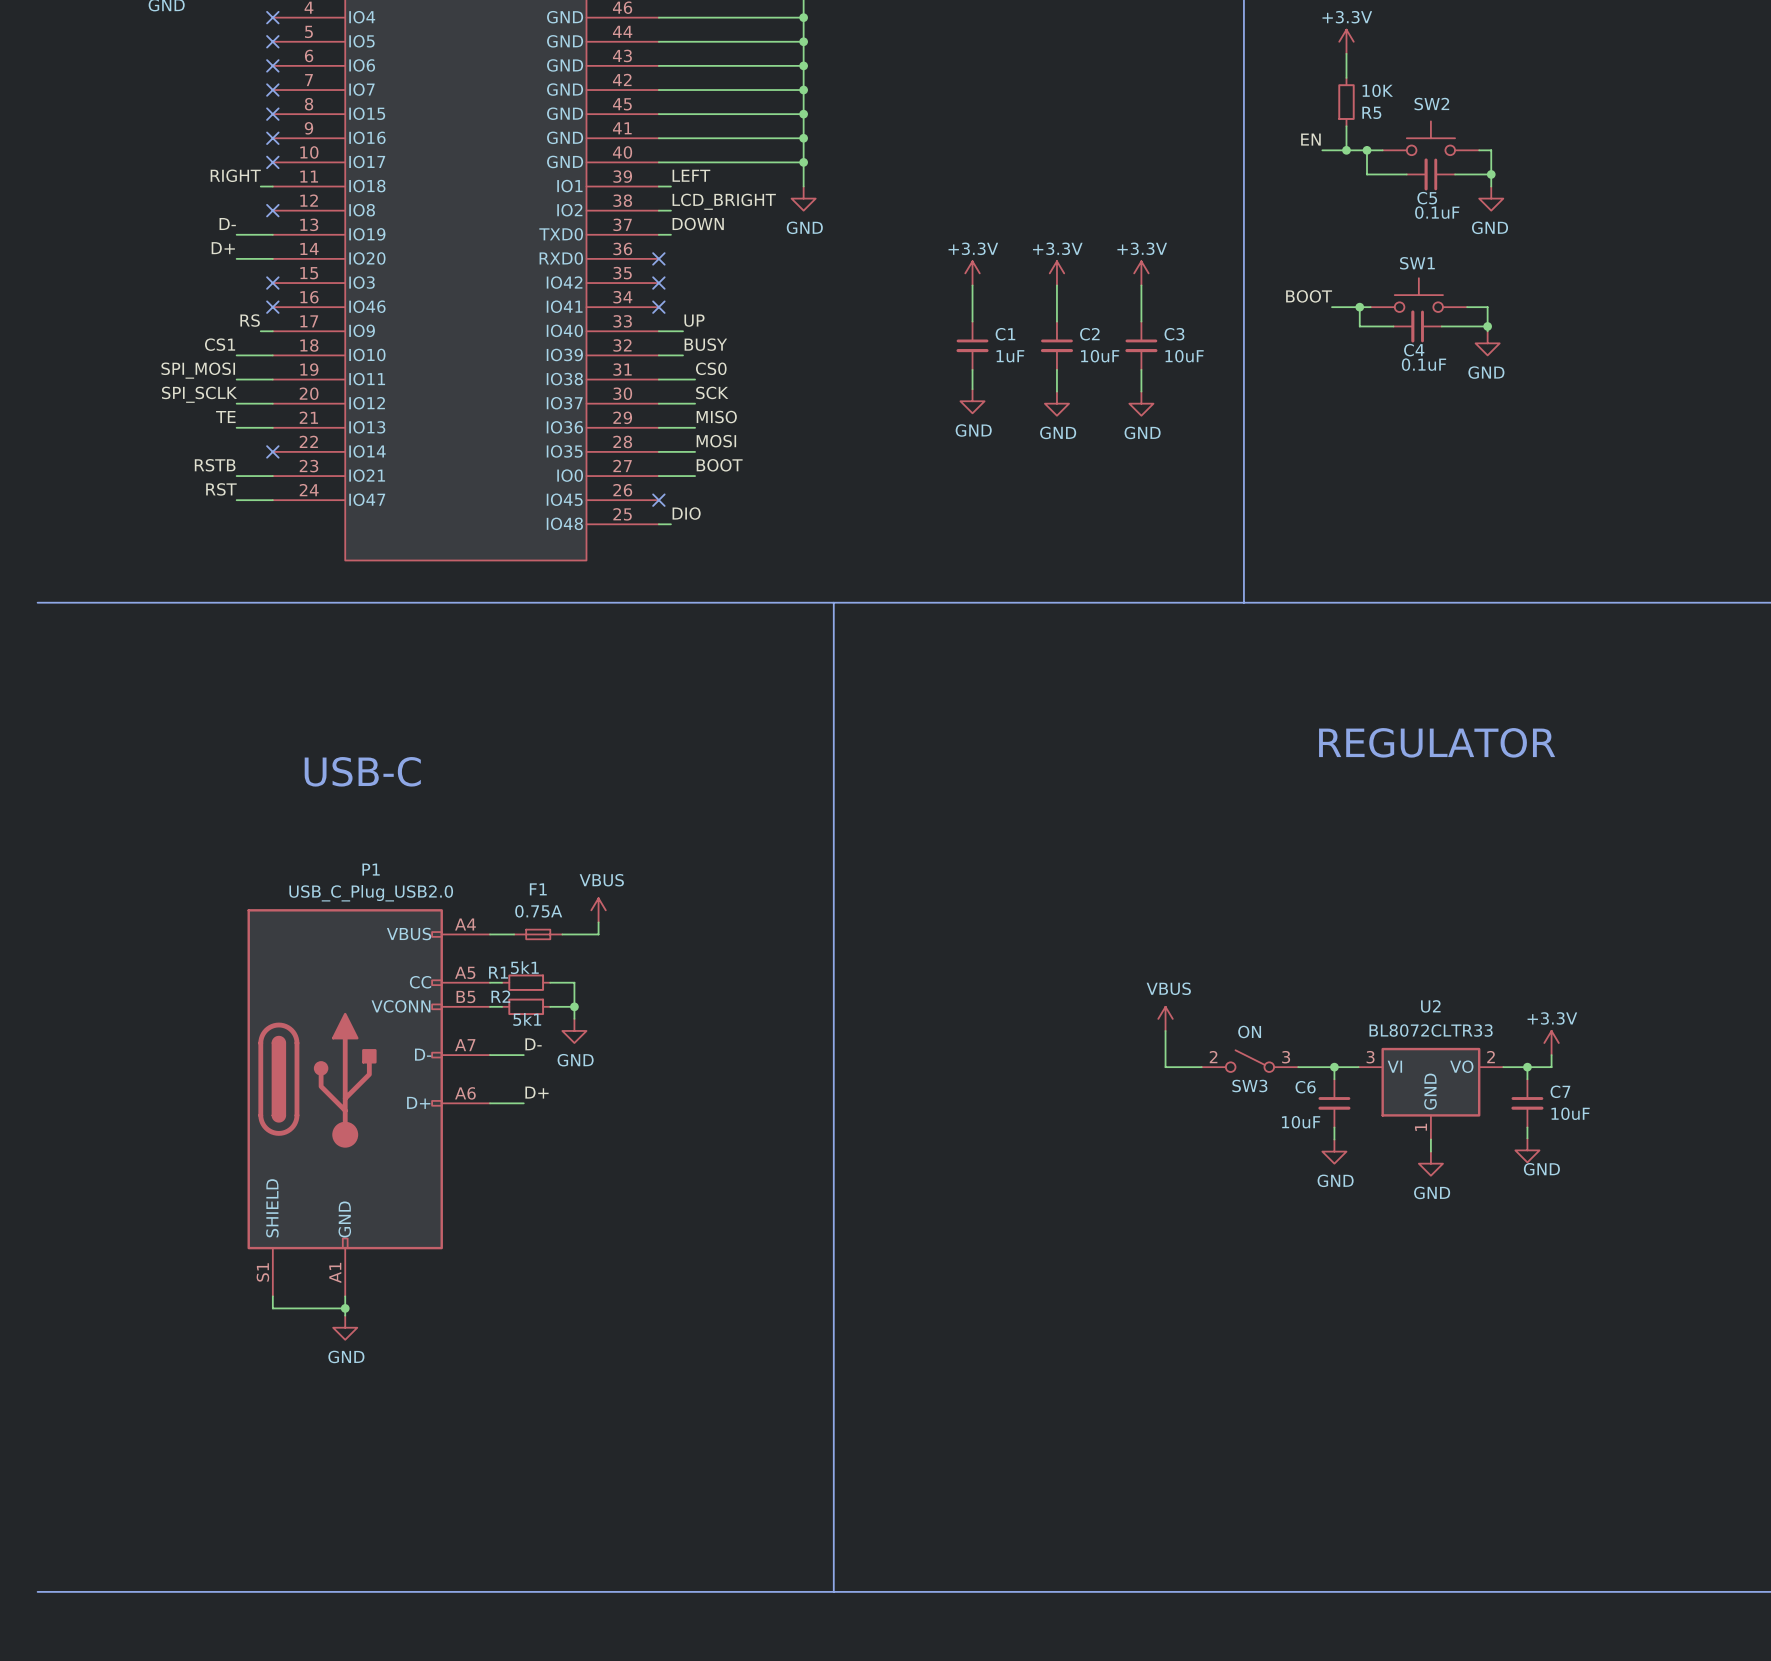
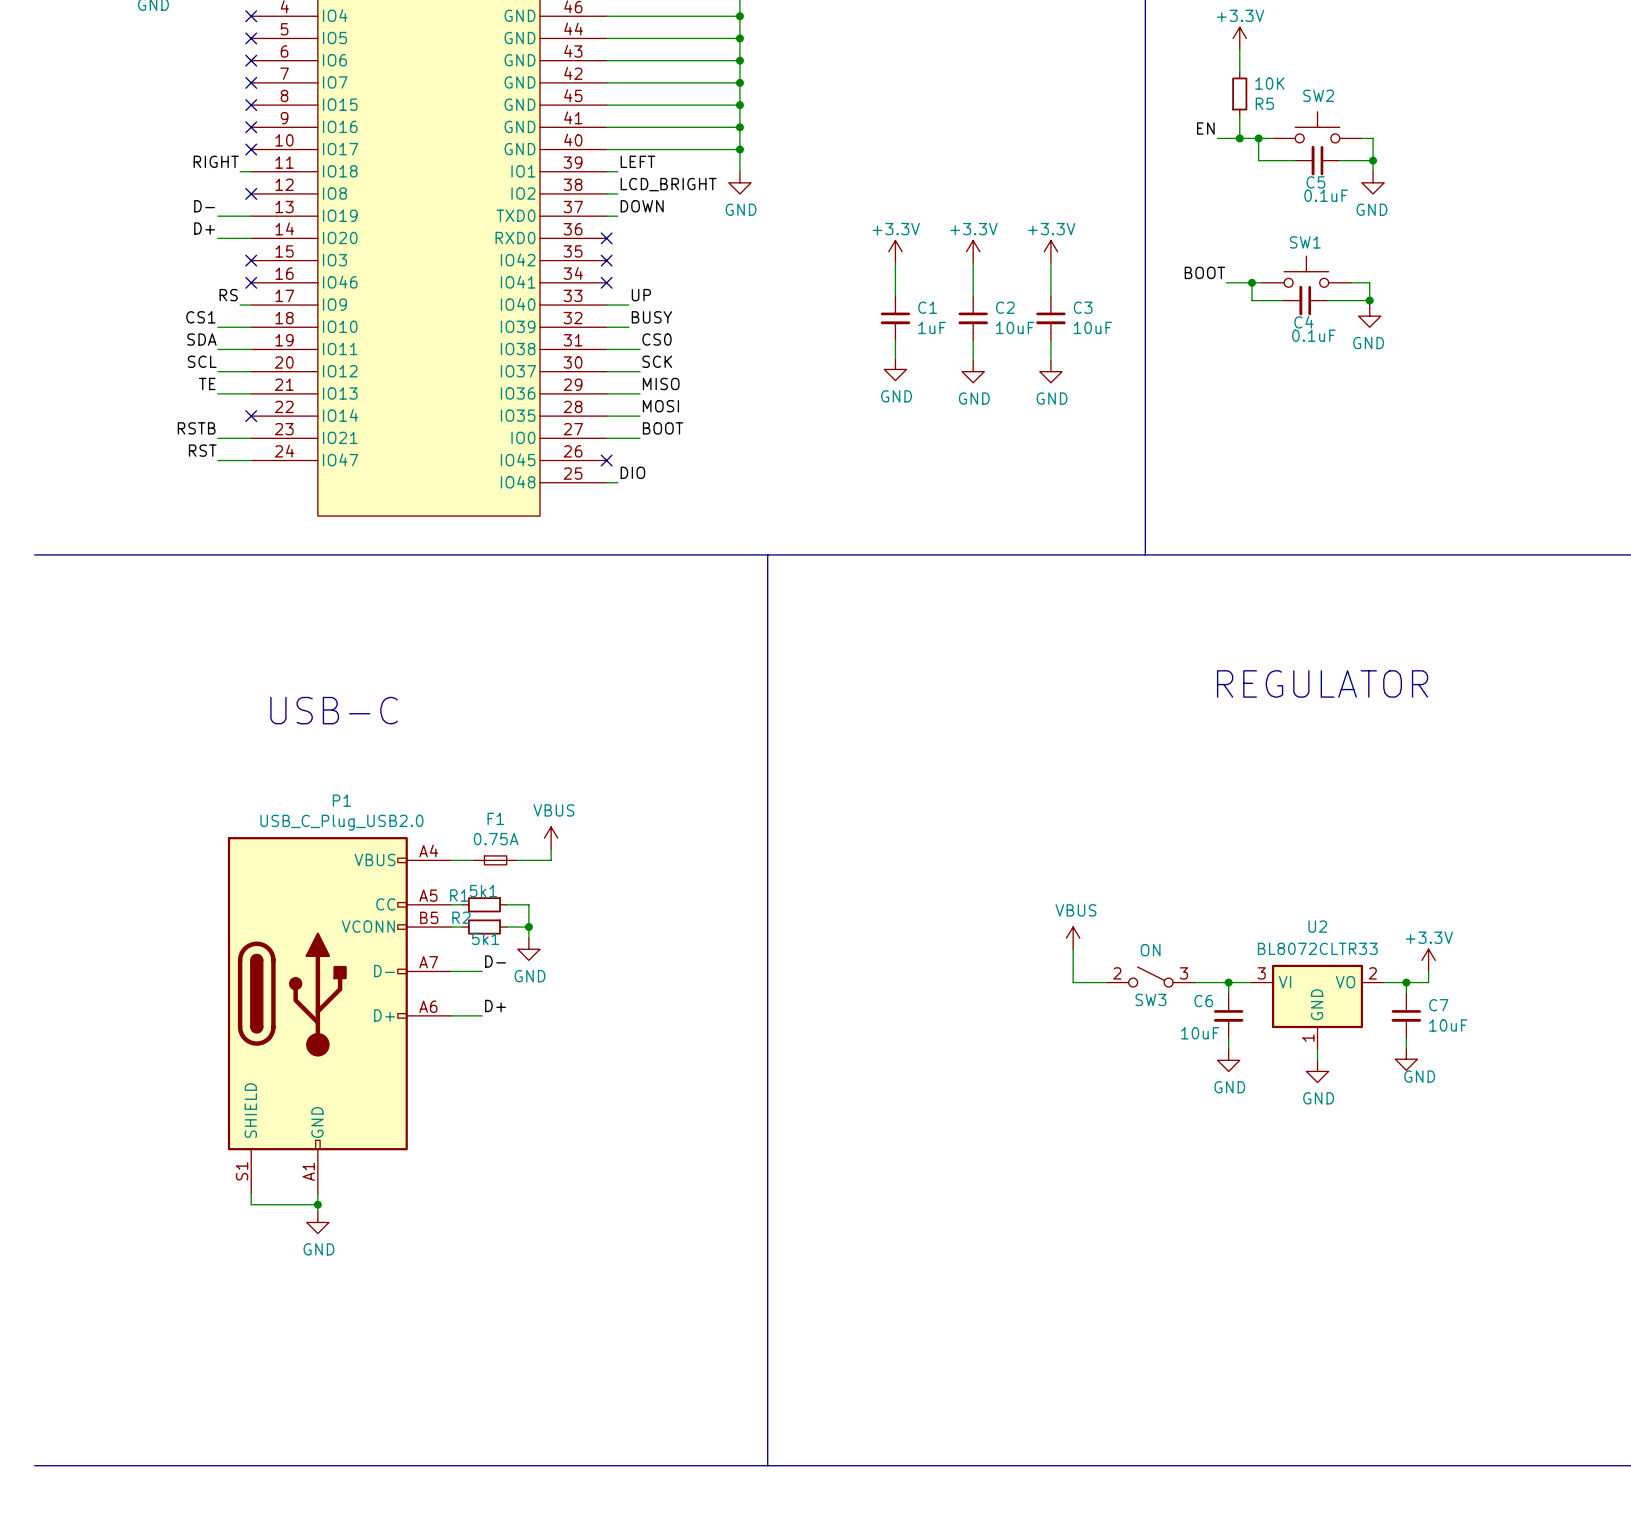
label: SPI_MOSI (198, 370) -> SDA (201, 339)
label: SPI_SCLK (199, 394) -> SCL (202, 361)

